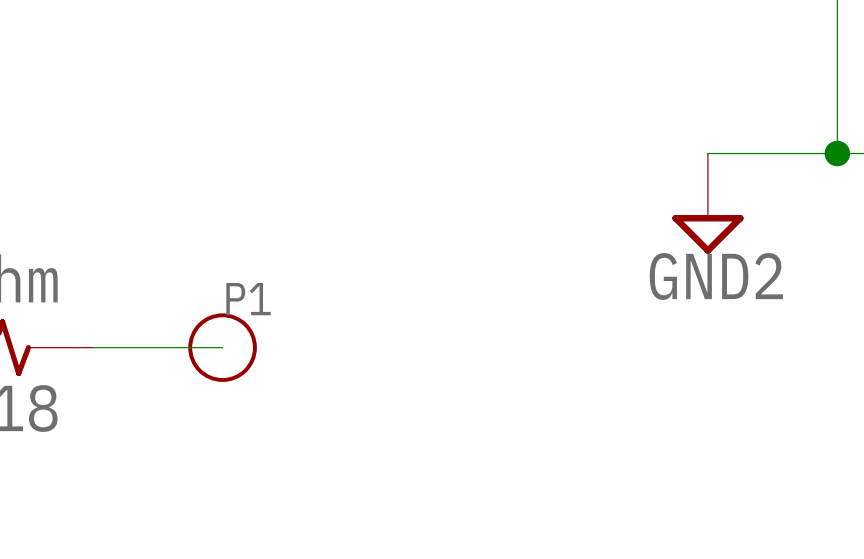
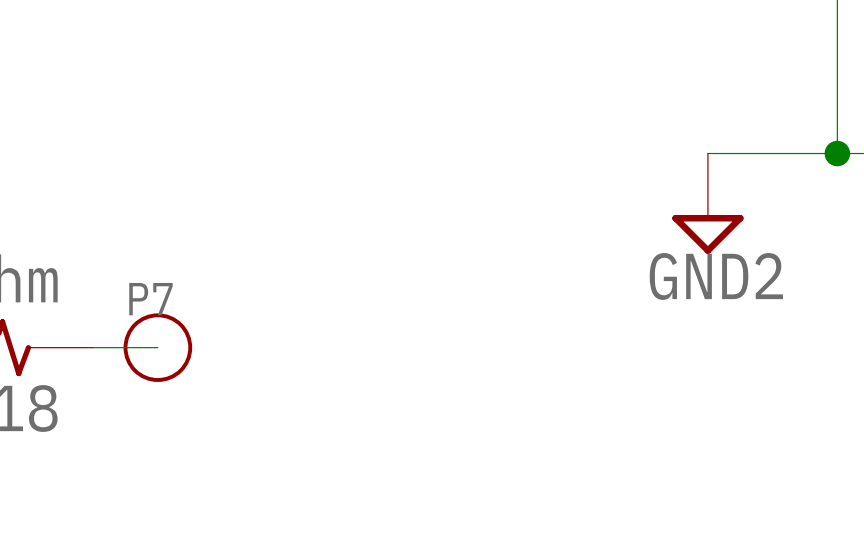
label: none -> P7 (150, 299)
label: P1 (248, 299) -> none
wire: (157, 347) (222, 347) -> none
drawing position: (222, 347) -> (157, 347)

